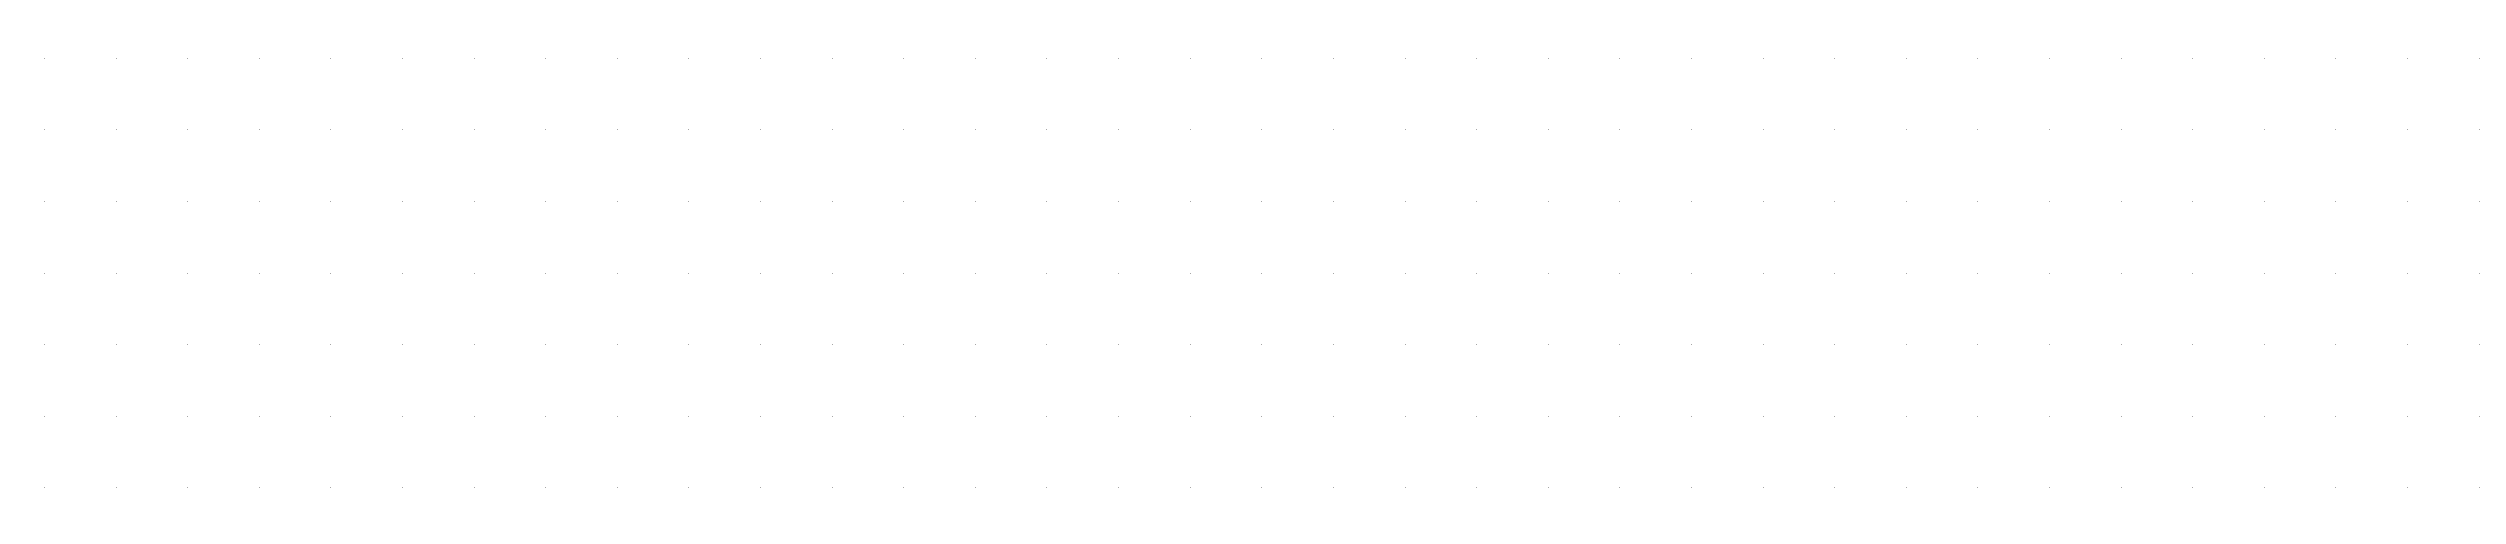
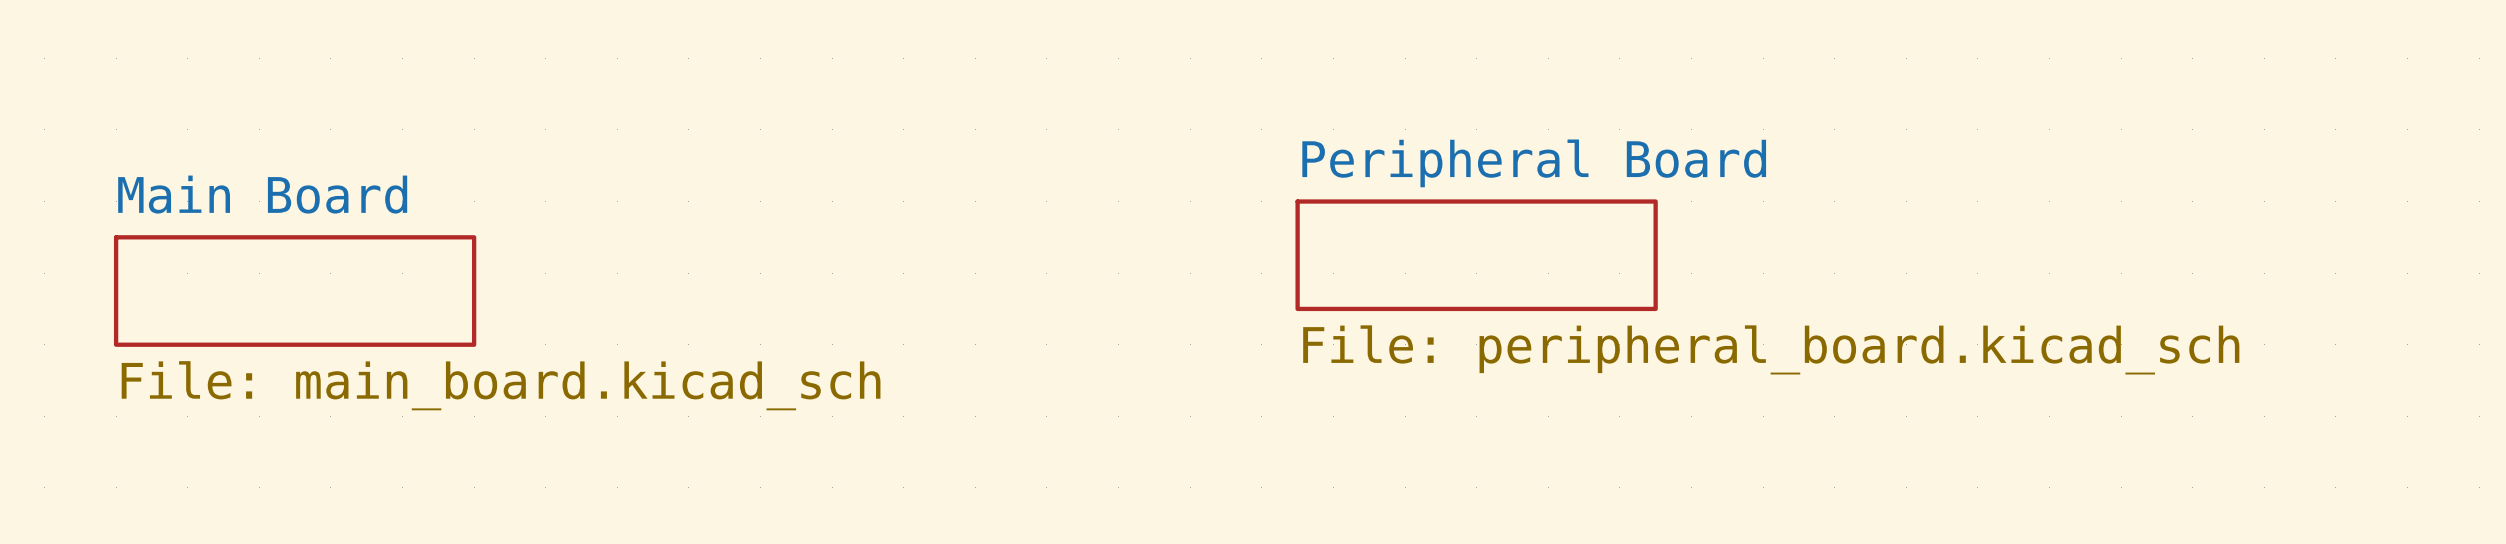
sheet Peripheral Board: none -> File: peripheral_board.kicad_sch (1476, 255)
sheet Main Board: none -> File: main_board.kicad_sch (295, 291)

